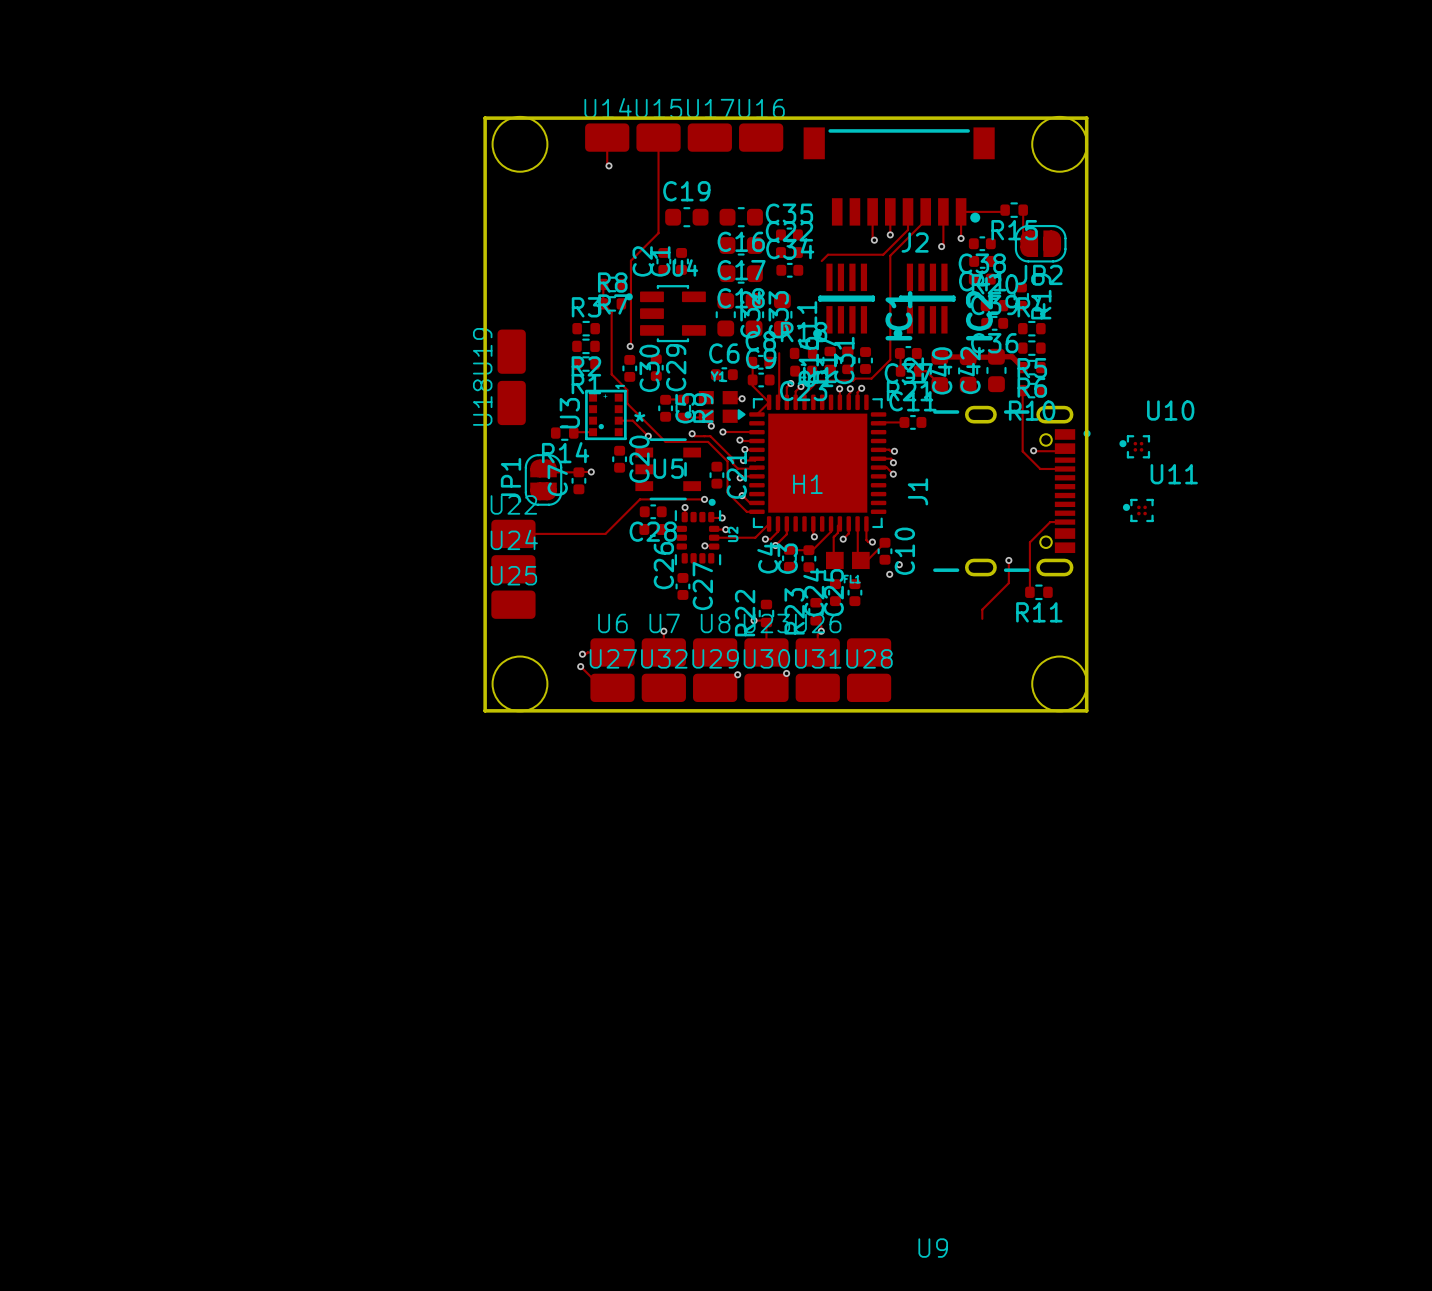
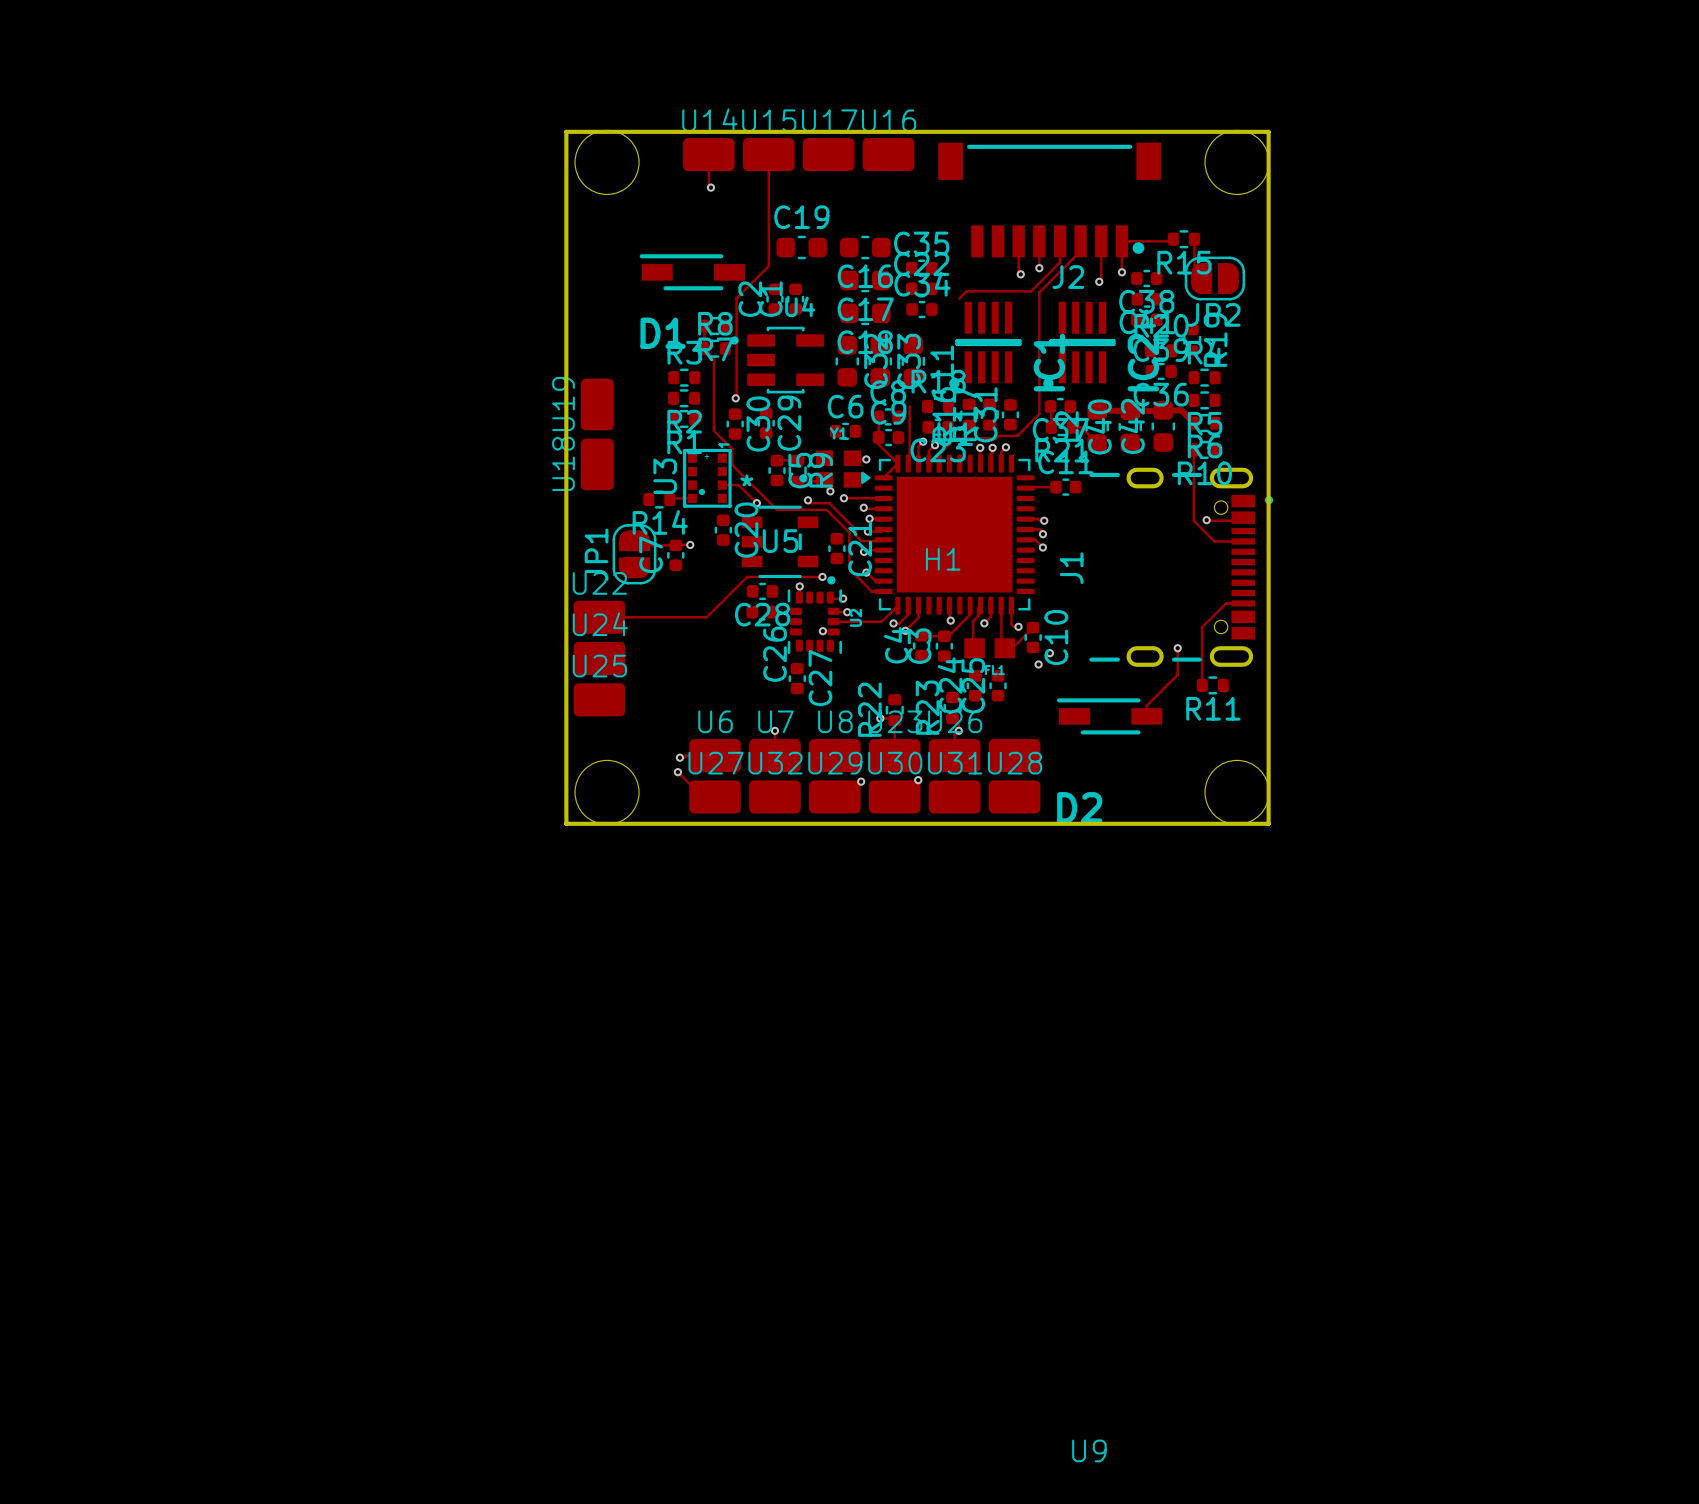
D1: none -> (692, 272)
U10: (1134, 446) -> none
U11: (1138, 510) -> none
D2: none -> (1109, 716)

